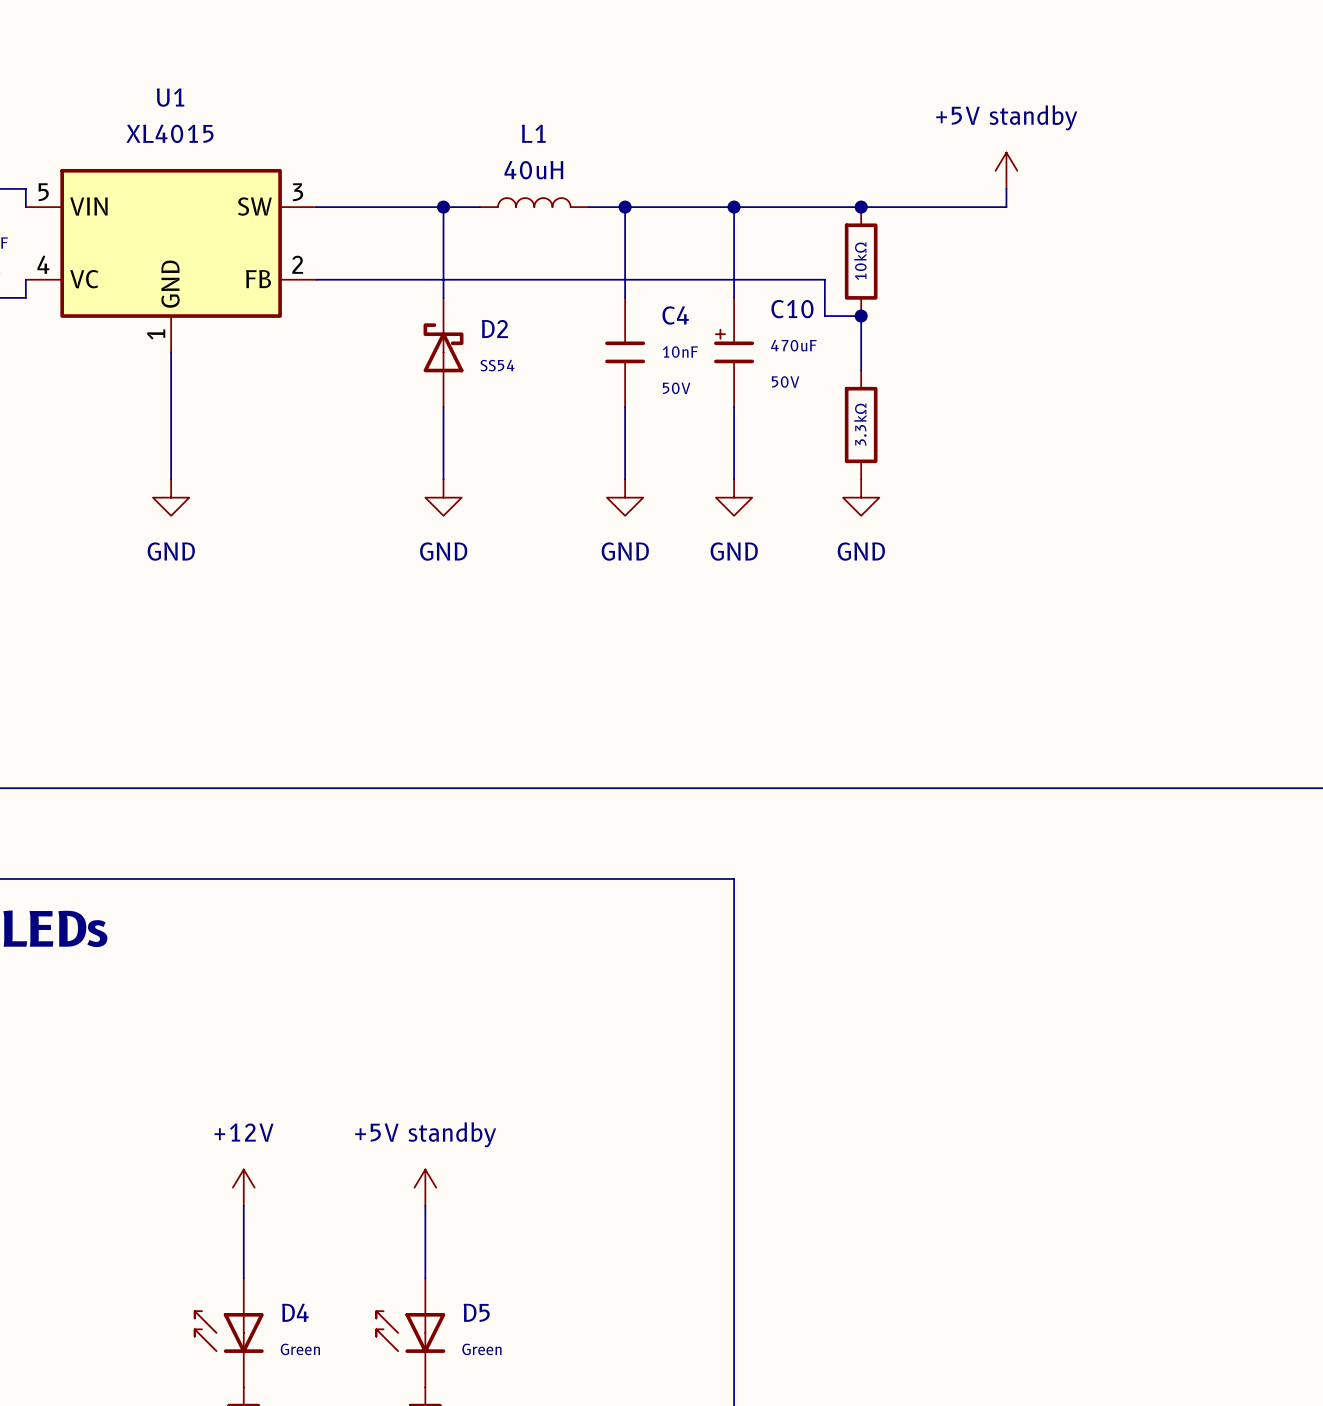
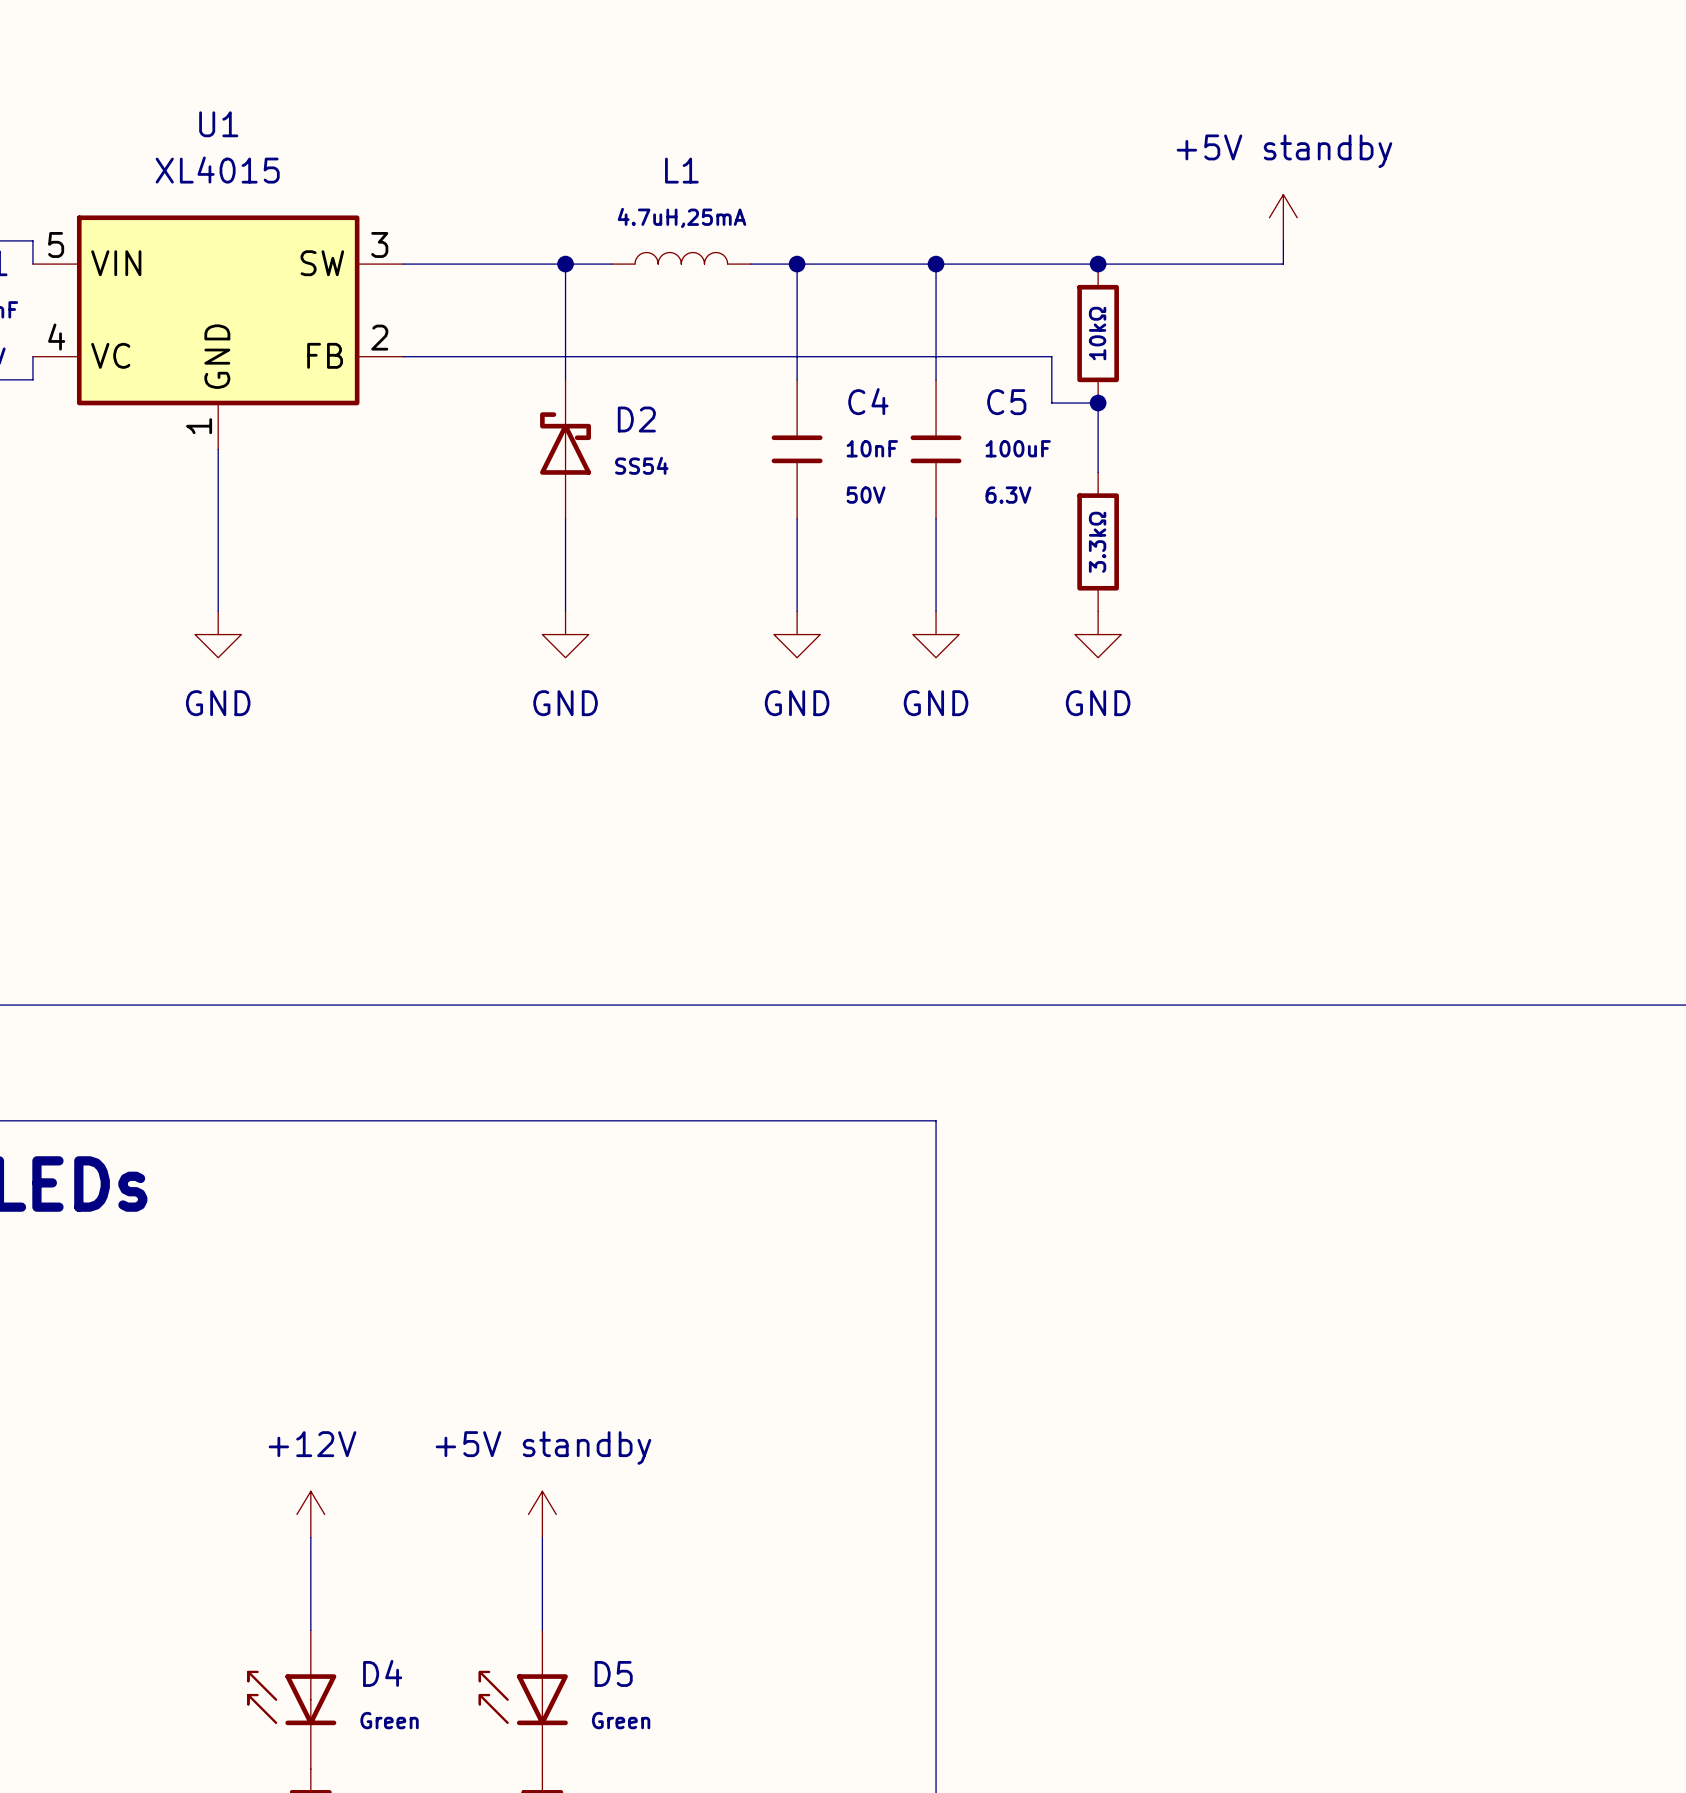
L1 value: 40uH (533, 170) -> 4.7uH,25mA (682, 217)
C10: 470uF (734, 352) -> none
C5: none -> 100uF (936, 449)

